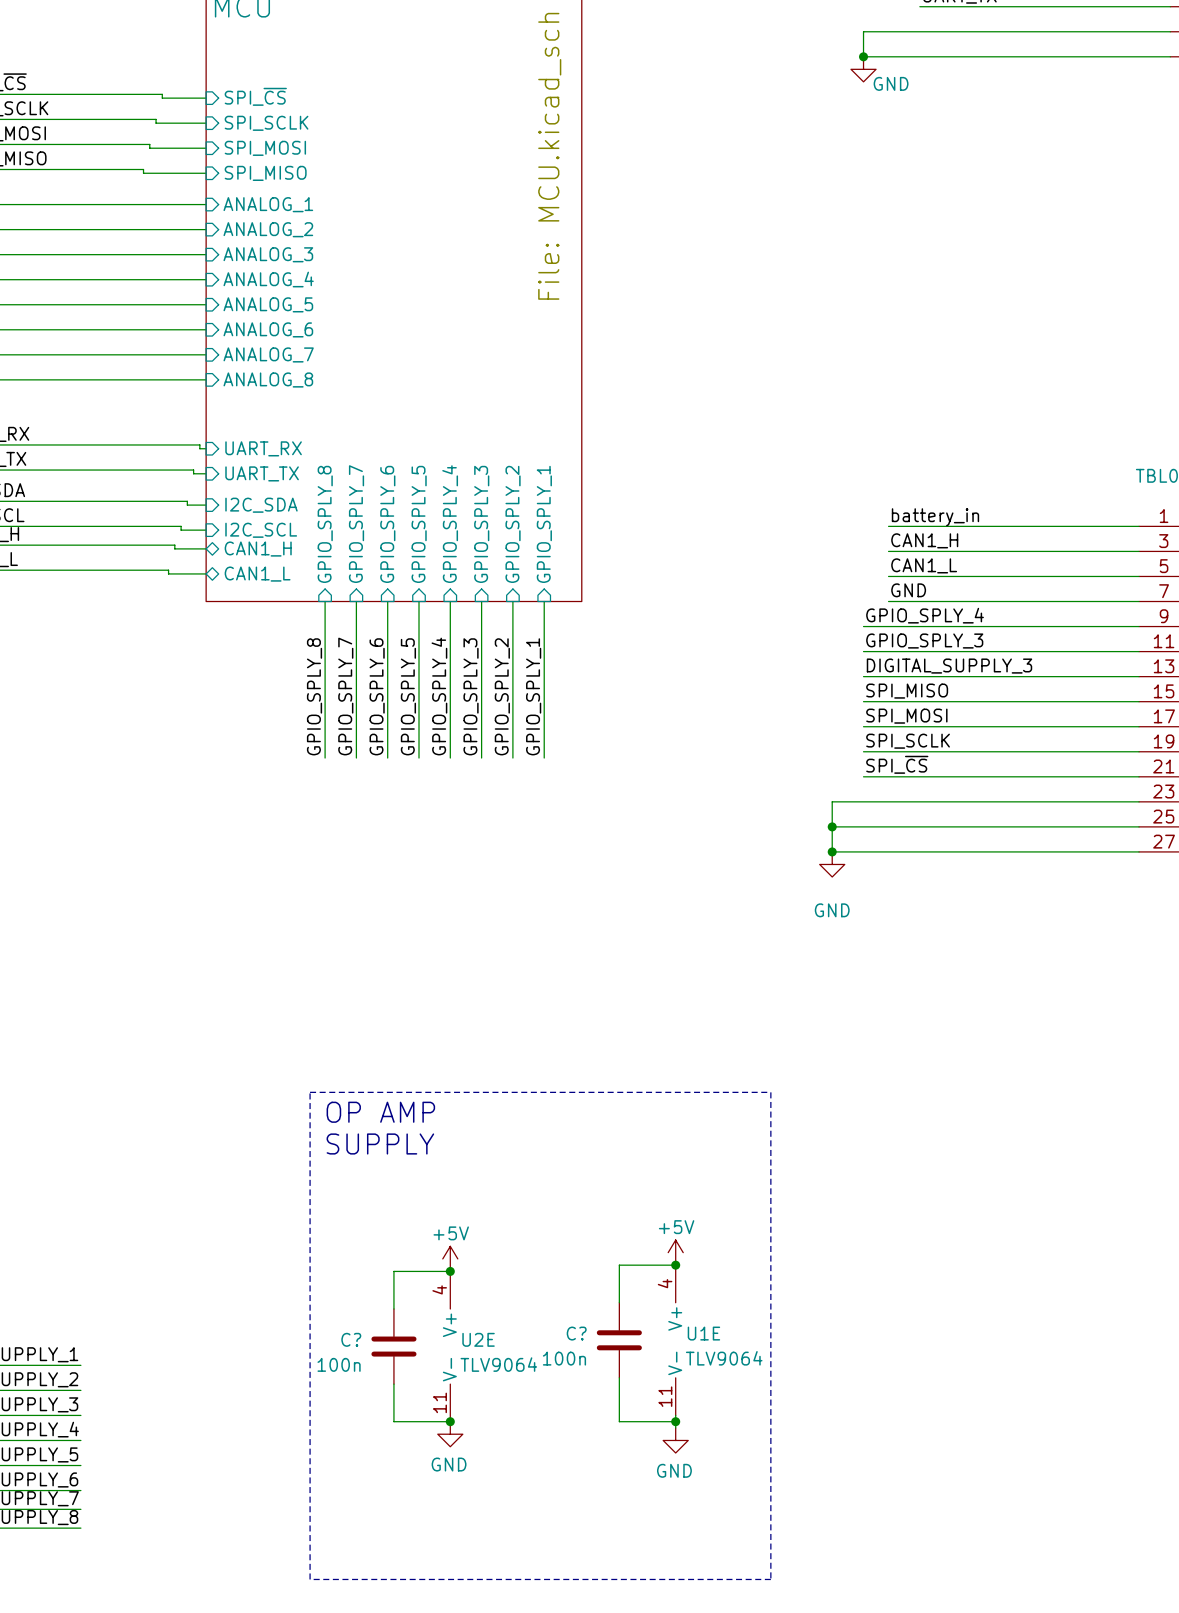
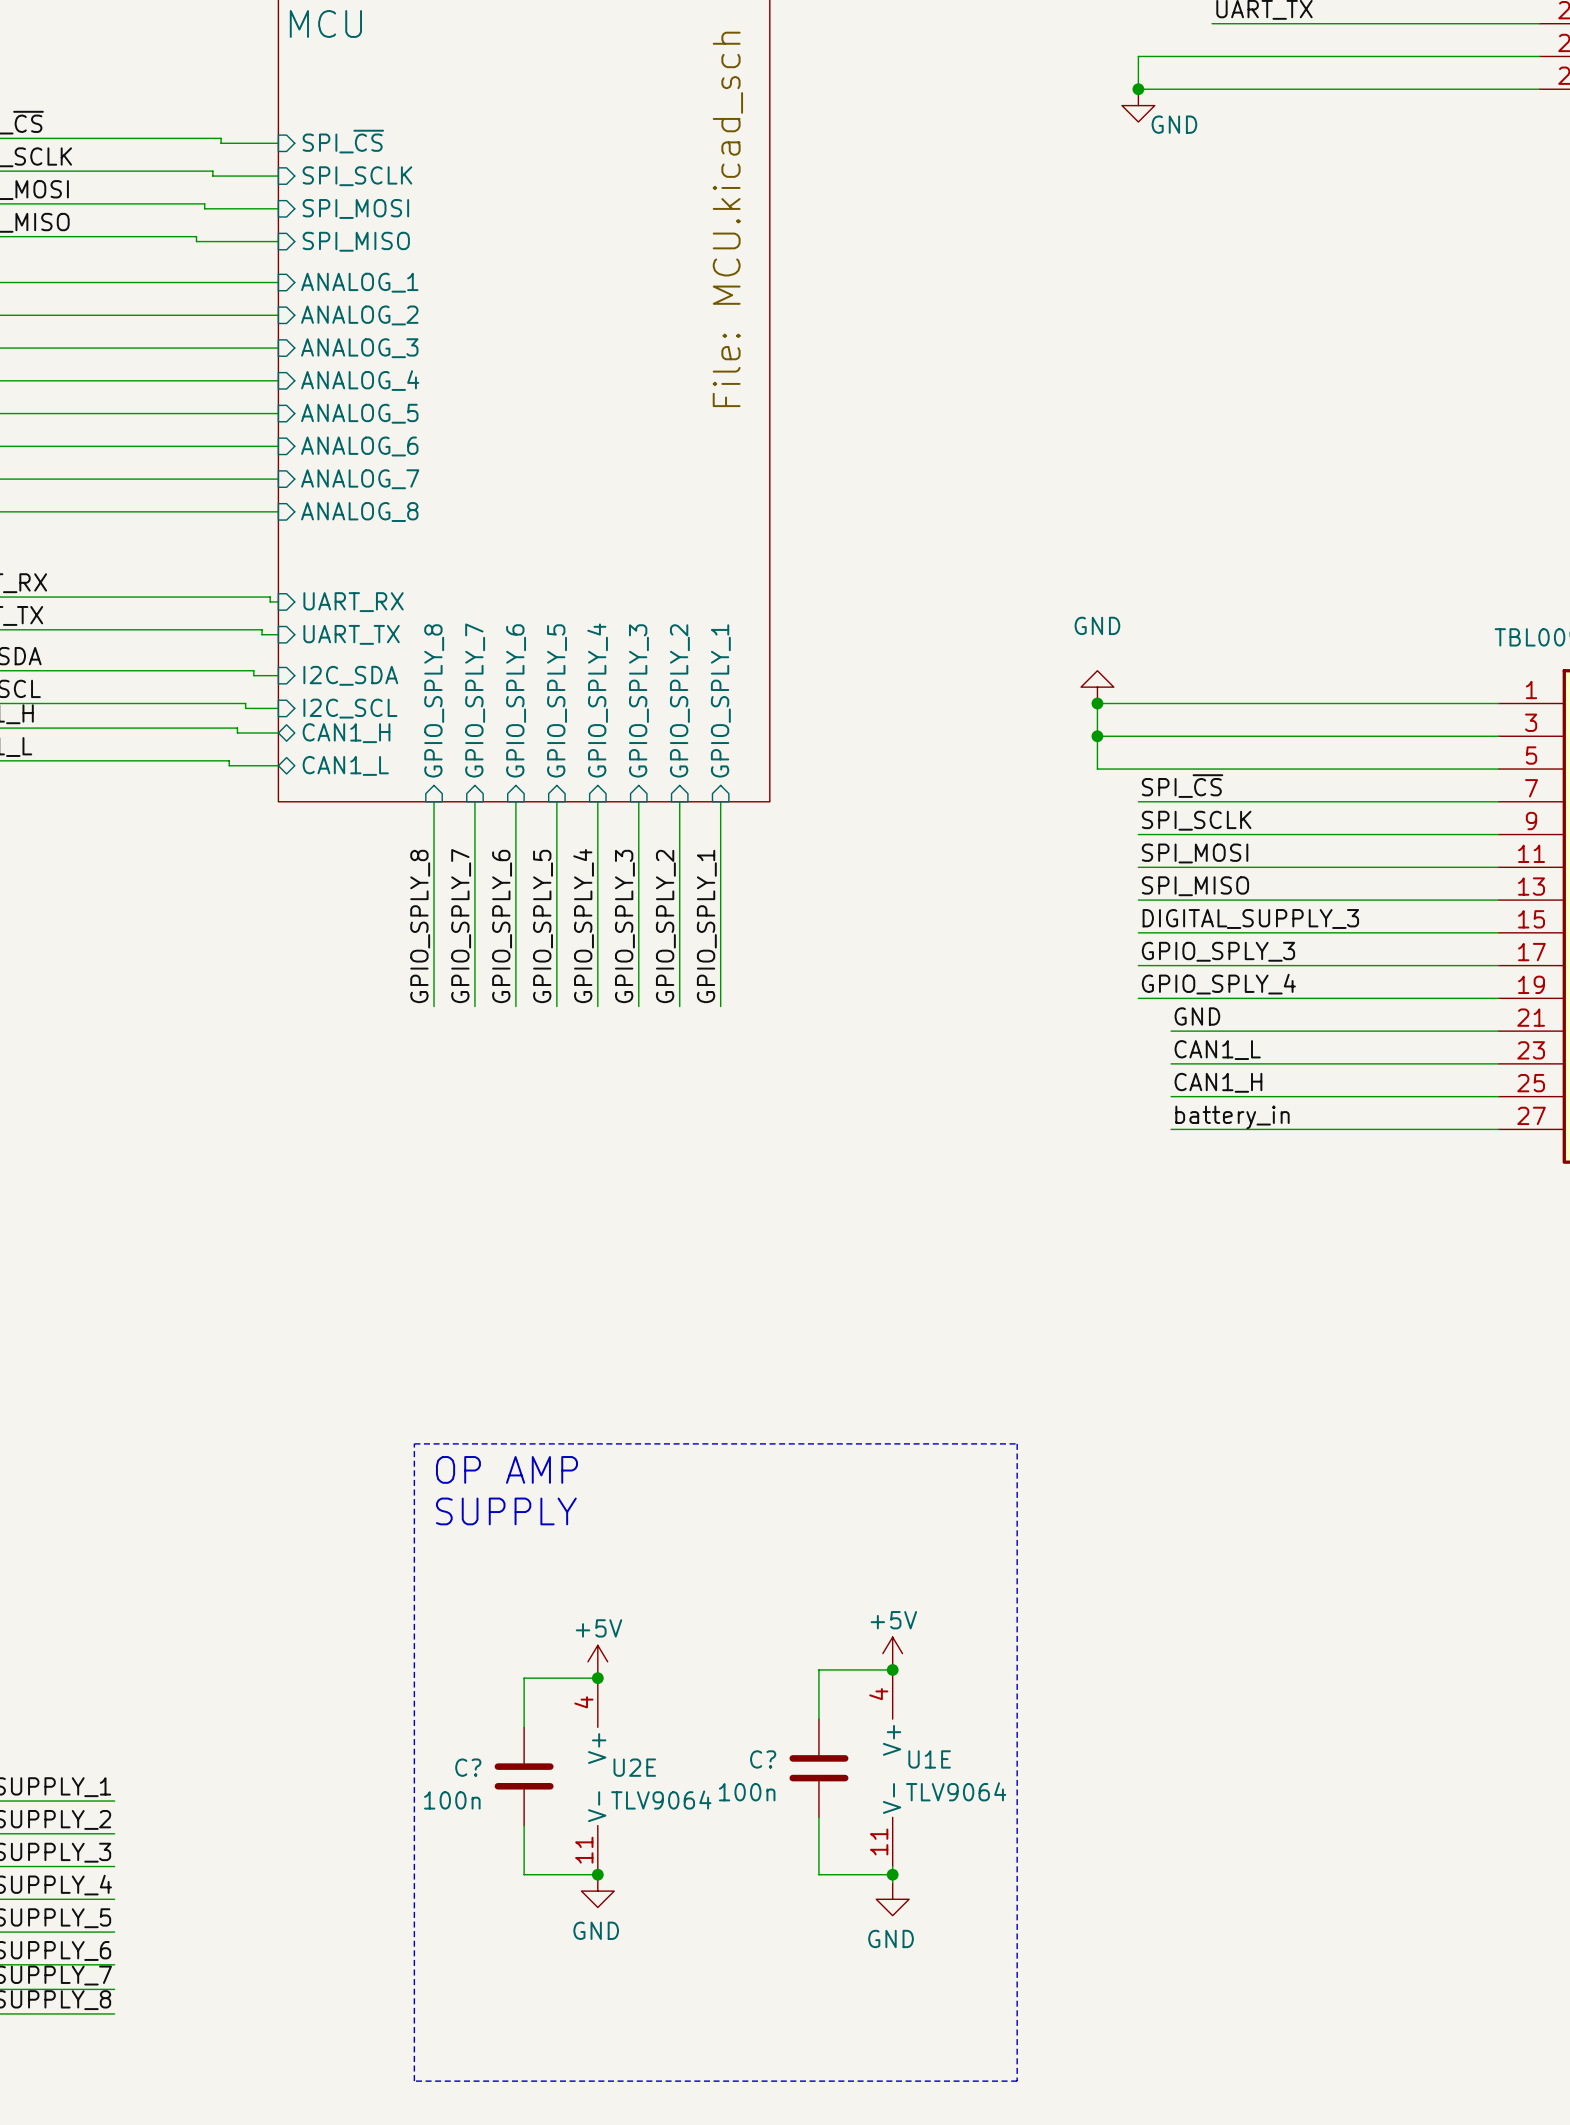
power symbol: none -> GND (1097, 687)
label: battery_in (935, 517) -> none
junction: none -> (1097, 703)
wire: none -> (1171, 703) (1097, 703) (1097, 769) (1171, 769)
label: CAN1_H (924, 540) -> none
wire: none -> (1097, 736) (1171, 736)
junction: none -> (1097, 736)
label position: CAN1_L (924, 565) -> CAN1_L (1217, 1050)
label position: GND (908, 590) -> GND (1197, 1016)
label: GPIO_SPLY_4 (925, 615) -> SPI_SCLK (1196, 820)
label: GPIO_SPLY_3 (924, 641) -> SPI_MOSI (1195, 853)
label: DIGITAL_SUPPLY_3 (949, 666) -> SPI_MISO (1195, 886)
label: SPI_MISO (907, 691) -> DIGITAL_SUPPLY_3 (1250, 919)
label: SPI_MOSI (906, 716) -> GPIO_SPLY_3 (1218, 951)
label: SPI_SCLK (908, 741) -> GPIO_SPLY_4 (1218, 984)
label position: SPI_~{CS} (897, 764) -> SPI_~{CS} (1182, 786)
wire: (863, 776) (888, 776) -> (1138, 801) (1171, 801)
wire: (888, 801) (832, 801) (832, 851) (888, 851) -> none
label: none -> CAN1_H (1218, 1082)
wire: (832, 826) (888, 826) -> none
junction: (832, 826) -> none
label: none -> battery_in (1232, 1117)
junction: (832, 851) -> none
power symbol: GND (832, 864) -> none

